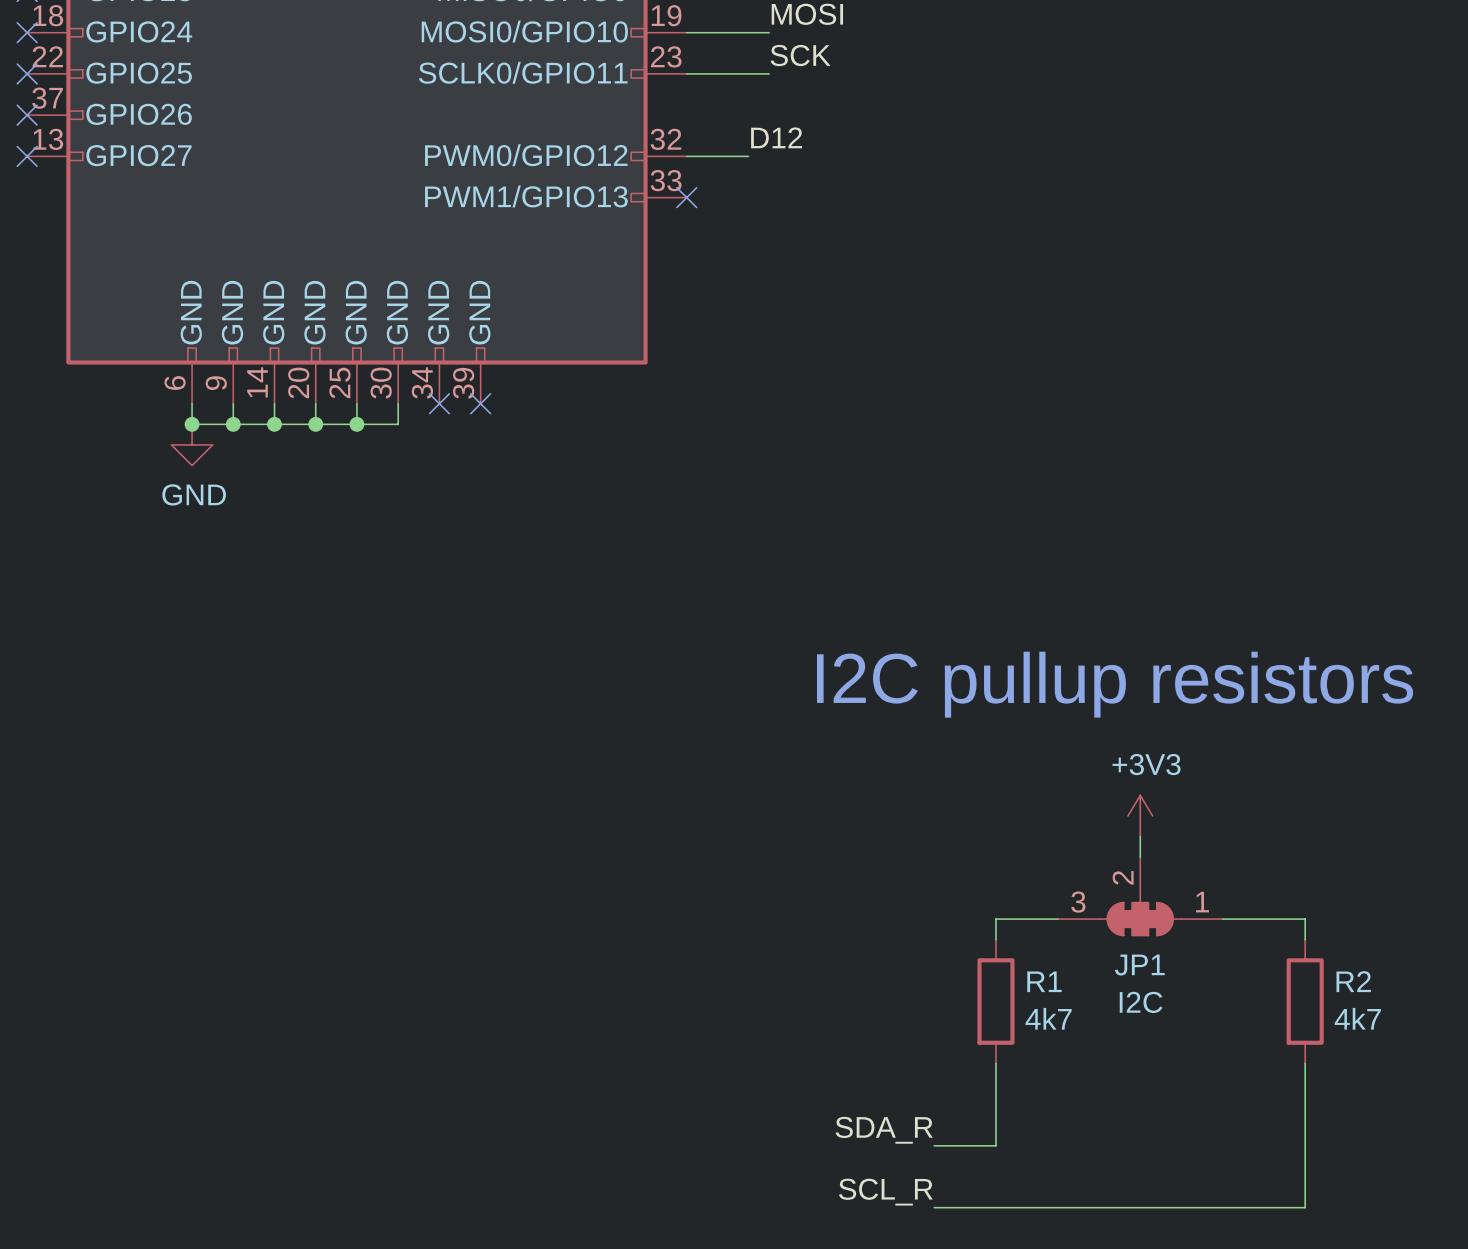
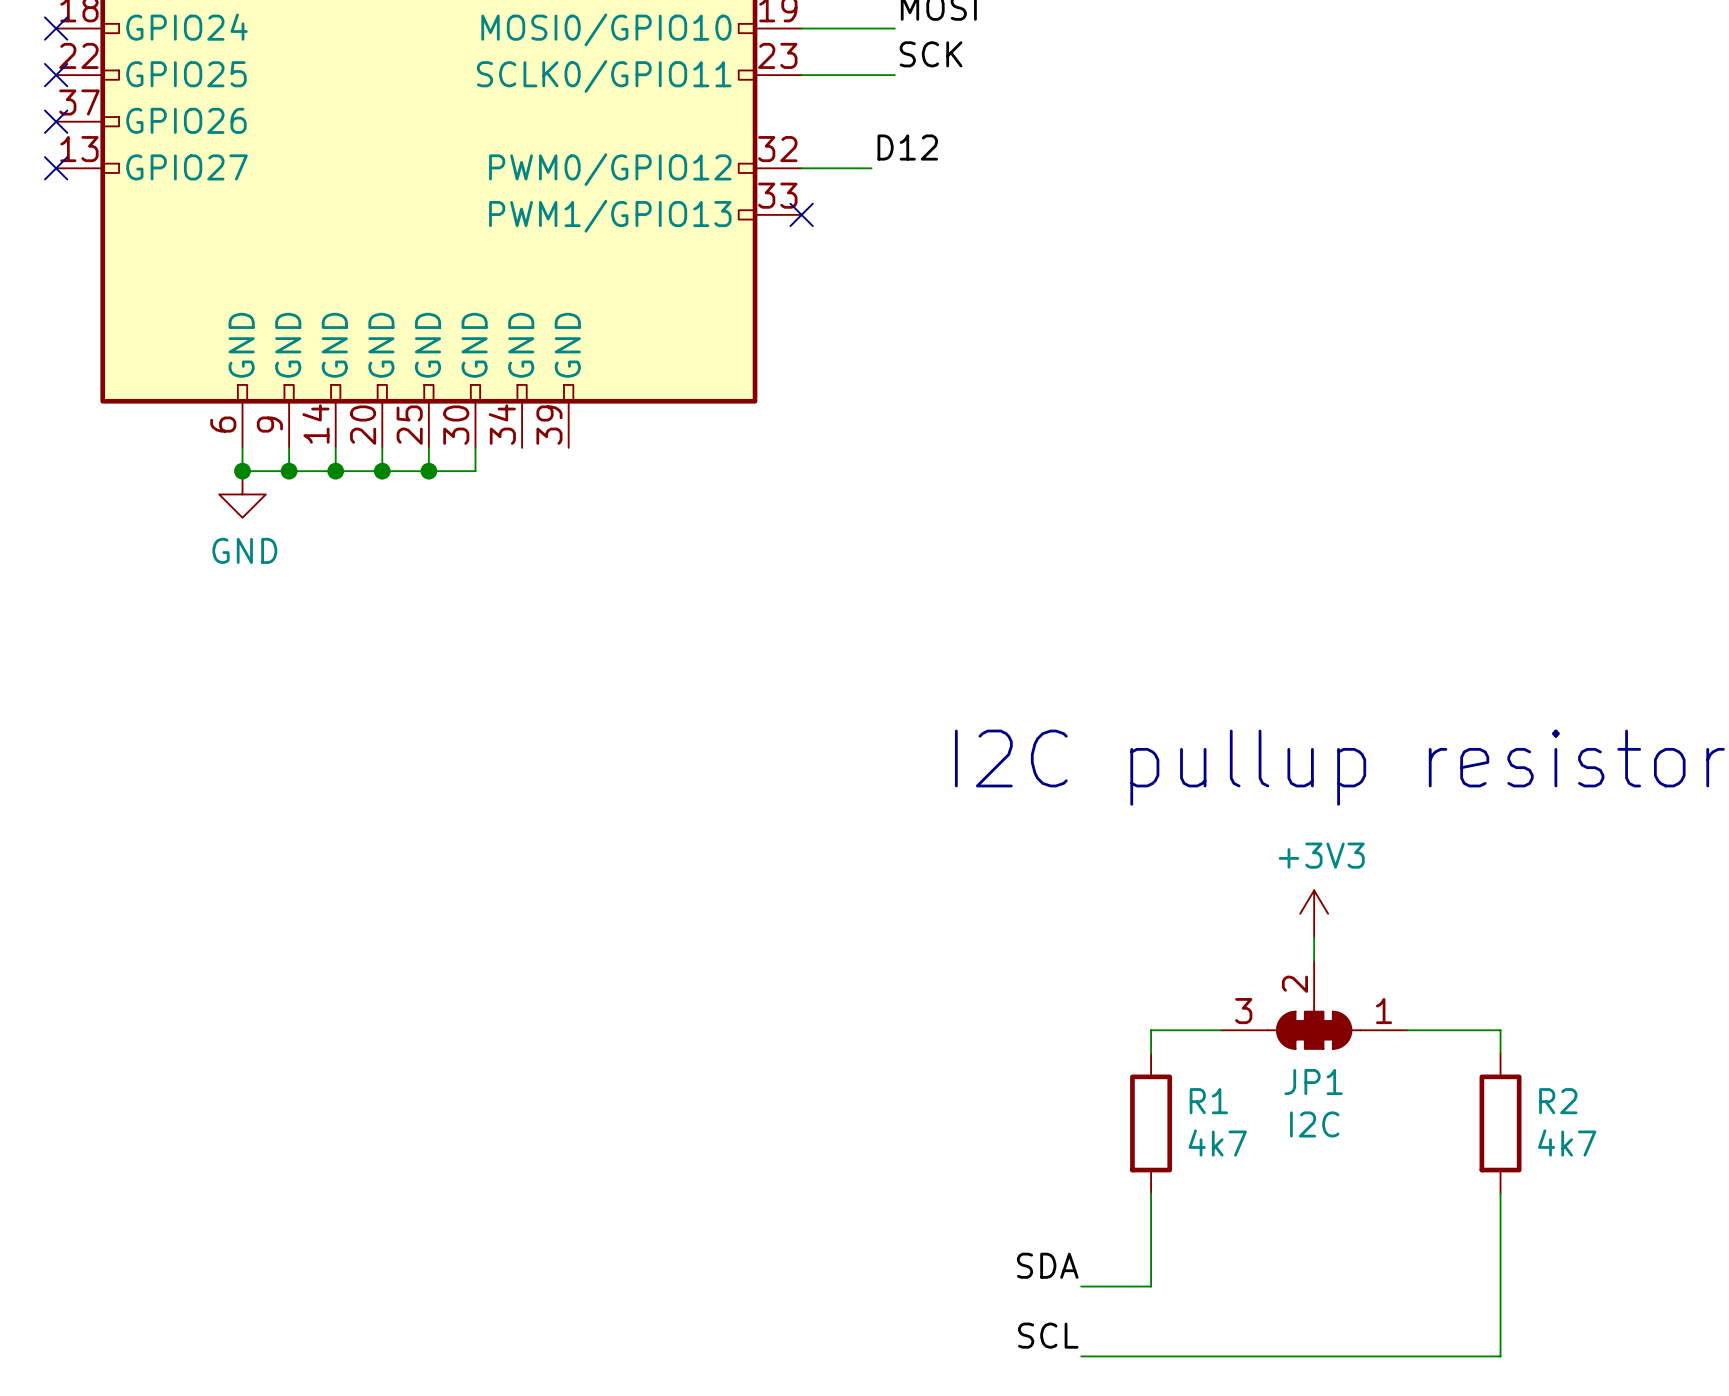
no-connect mark: (439, 403) -> none
no-connect mark: (480, 403) -> none
label: SDA_R (884, 1130) -> SDA (1047, 1265)
label: SCL_R (885, 1192) -> SCL (1048, 1335)

